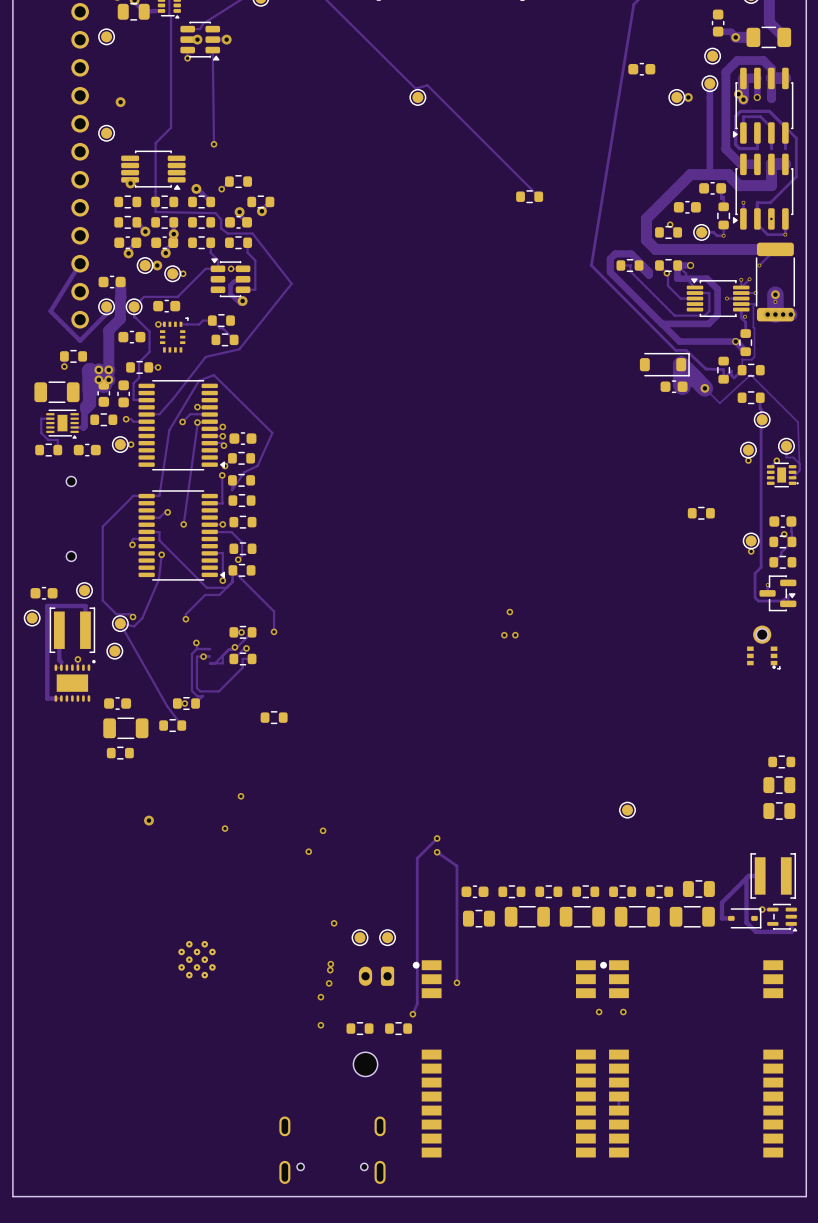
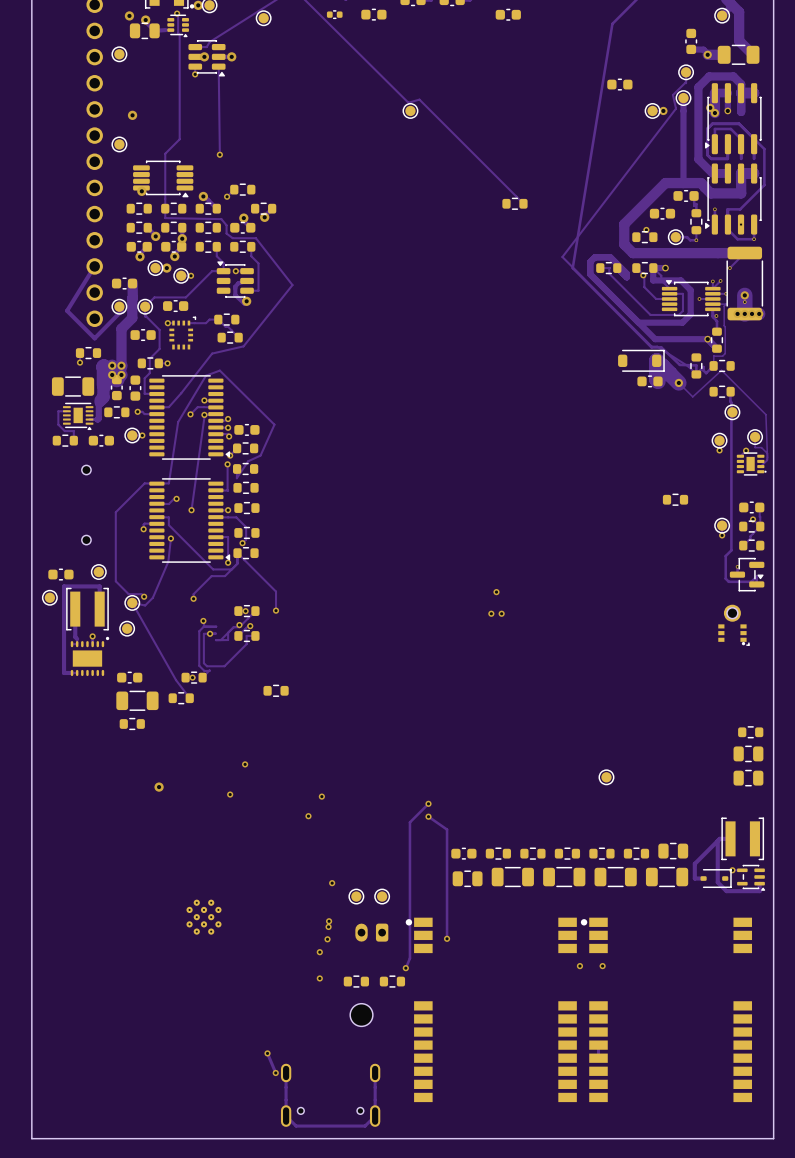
track: none -> (686, 72) (686, 83) (672, 94) (676, 108) (562, 257) (651, 346) (657, 346) (688, 366) (696, 374)
track: none -> (267, 1053) (275, 1072)
via: none -> (267, 1053)
via: none -> (275, 1072)
track: none -> (375, 1072) (375, 1116) (365, 1126) (296, 1126) (286, 1116) (286, 1072)

